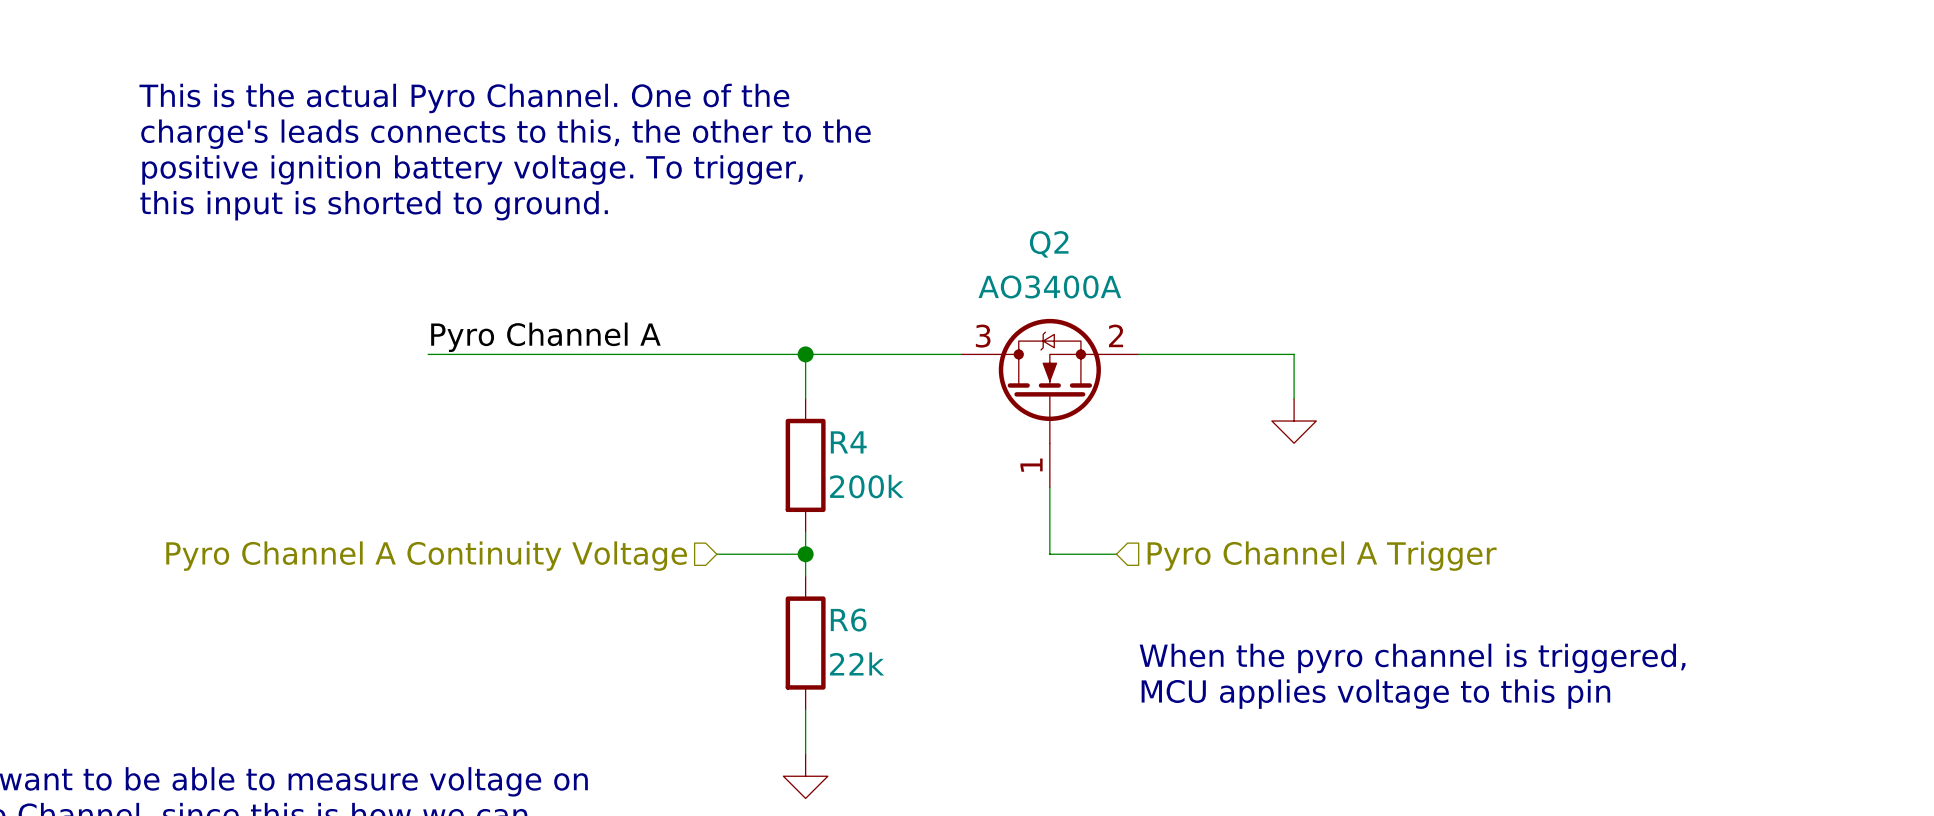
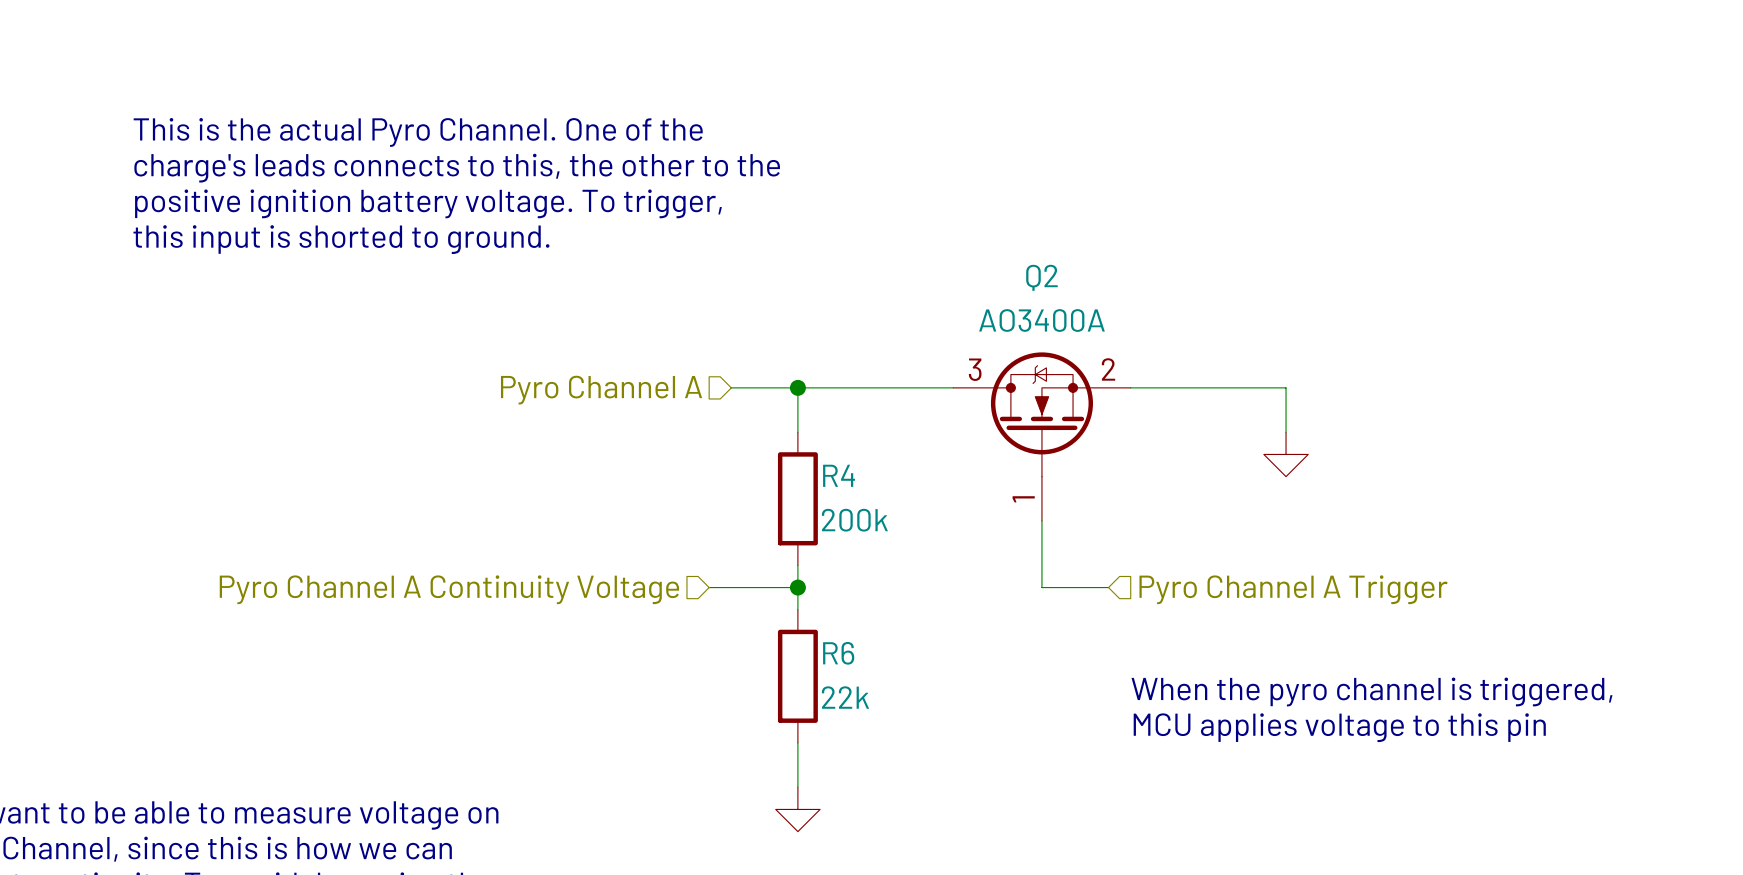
label: Pyro Channel A (545, 337) -> none
wire: (428, 354) (739, 354) -> none
hierarchical label: none -> Pyro Channel A (601, 390)

